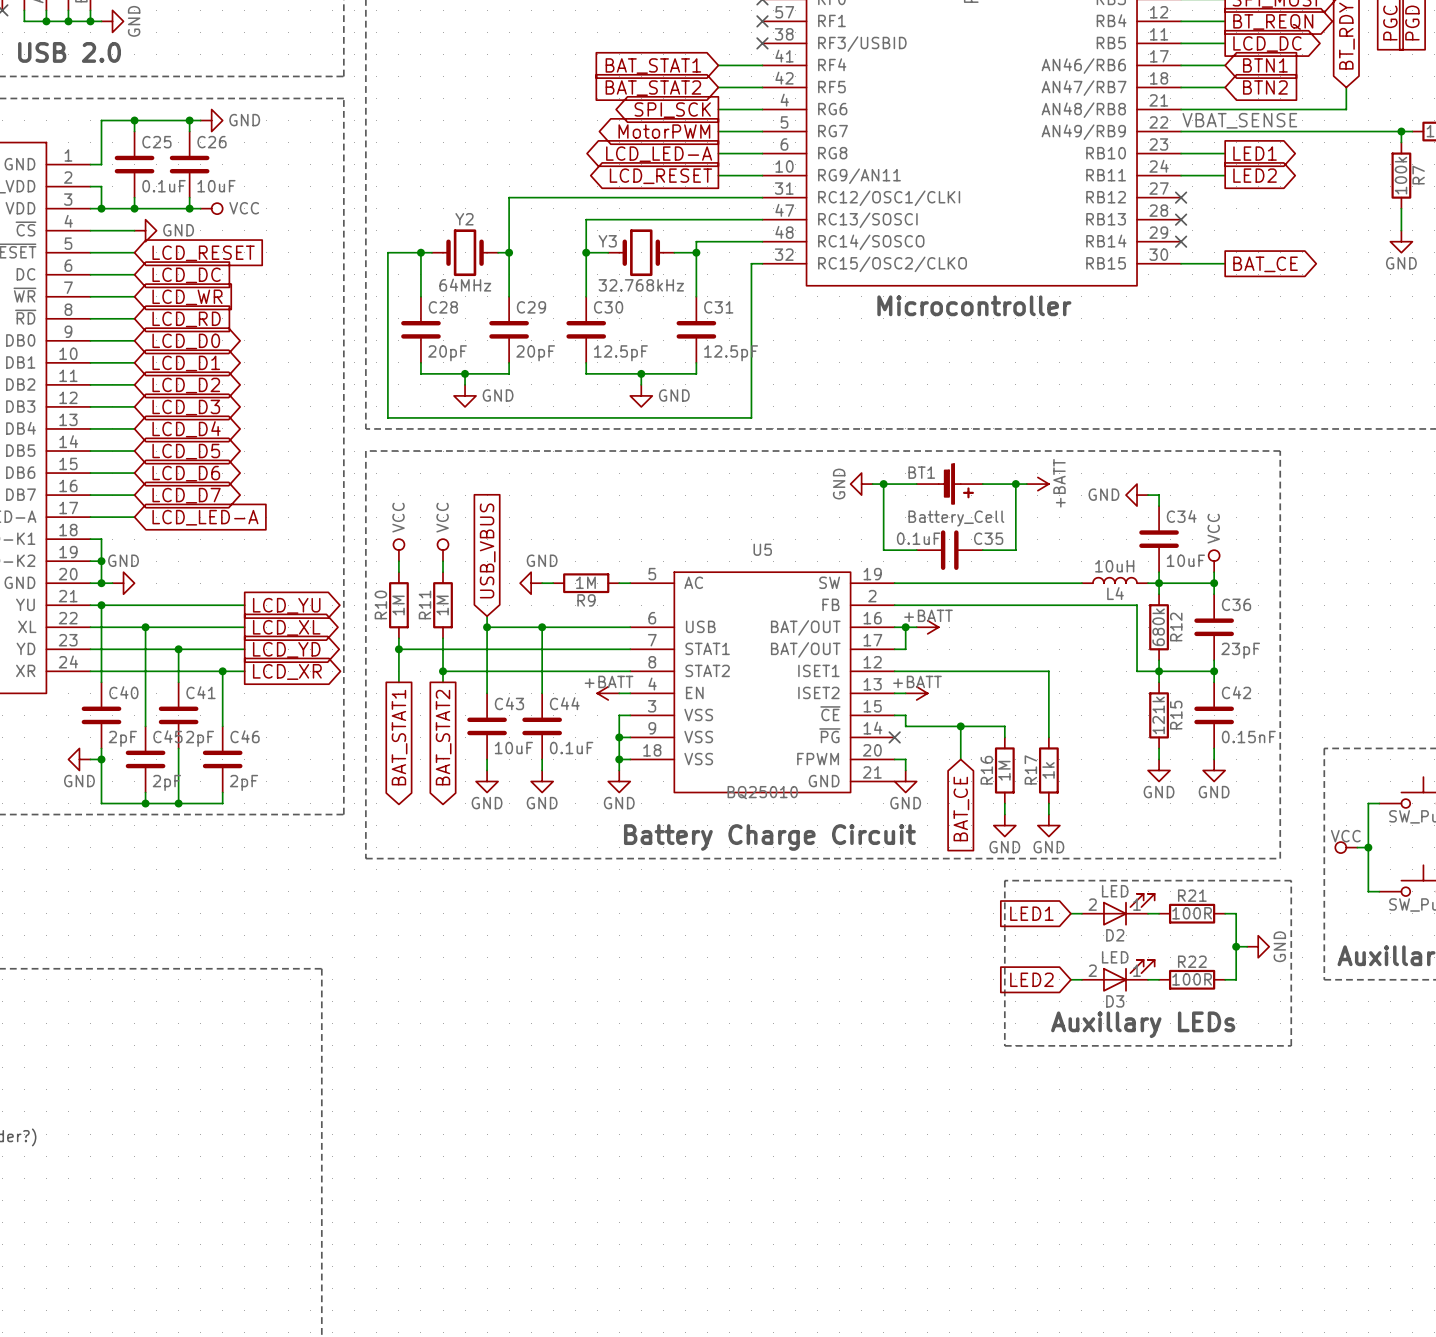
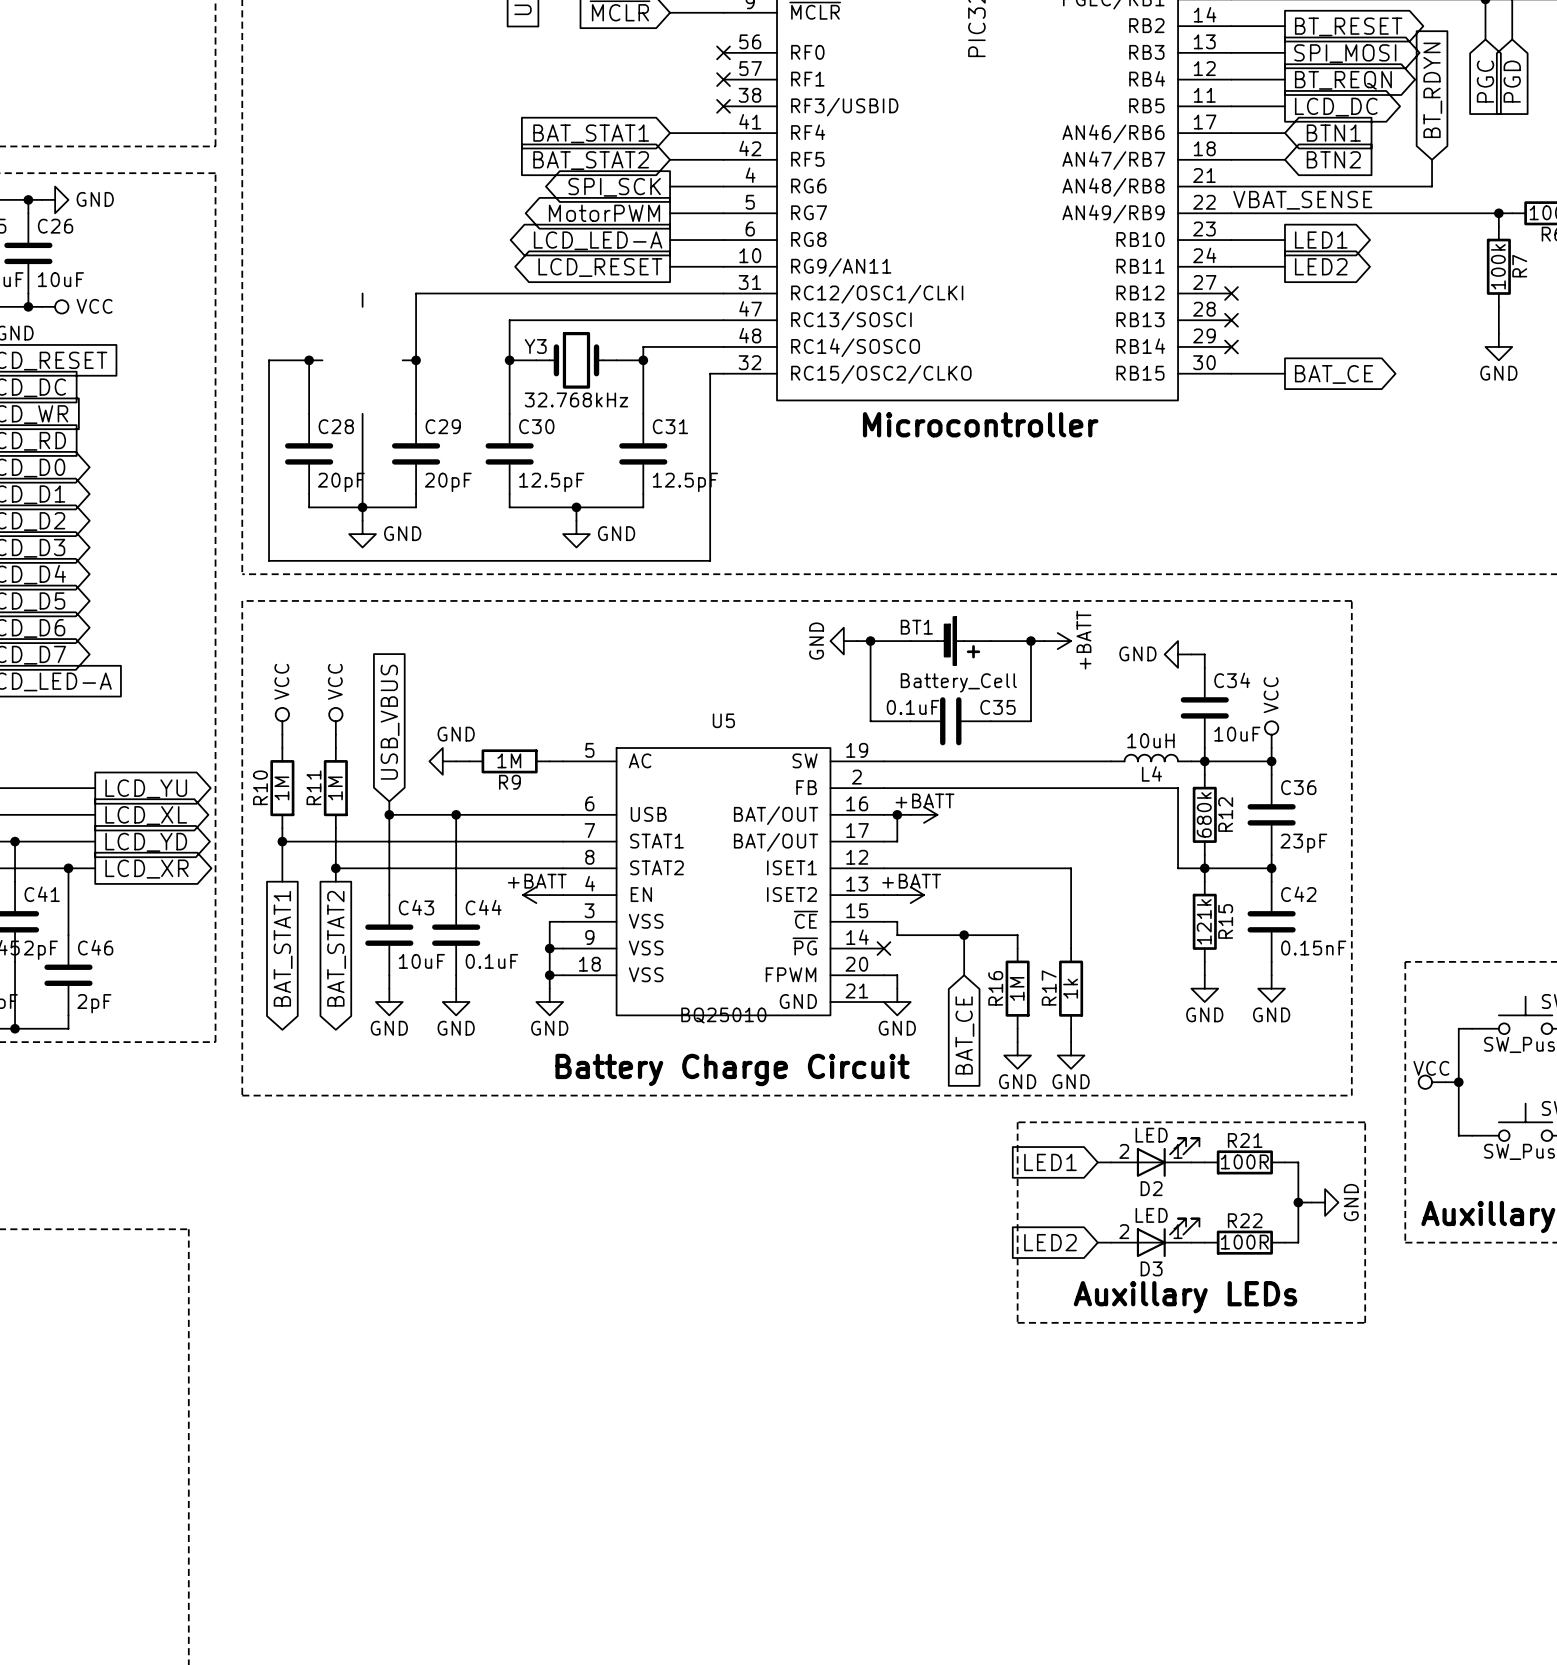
wire: none -> (362, 293) (362, 306)
Y2: 64MHz (465, 252) -> none
wire: none -> (362, 413) (362, 507)

